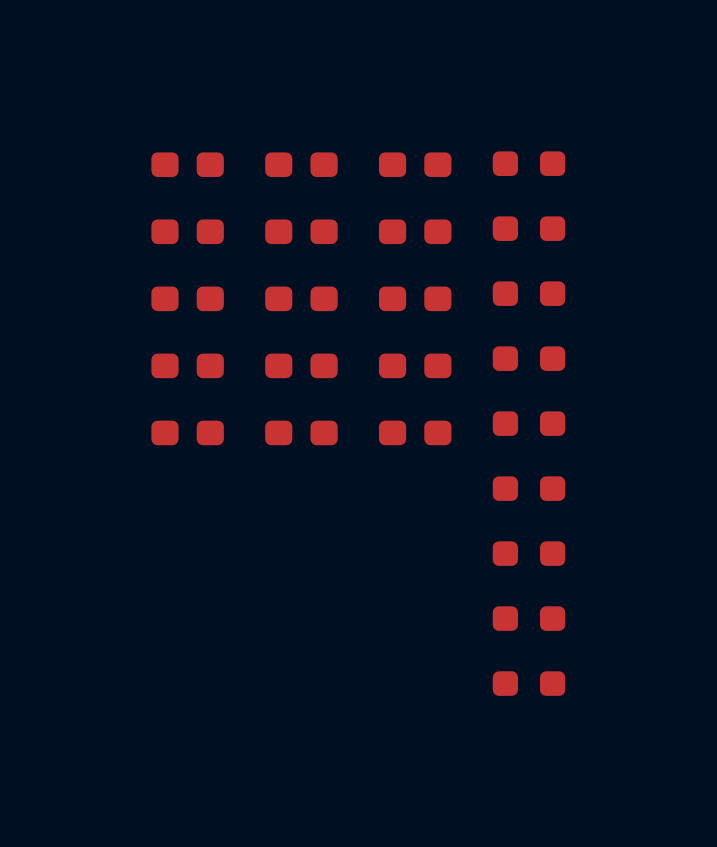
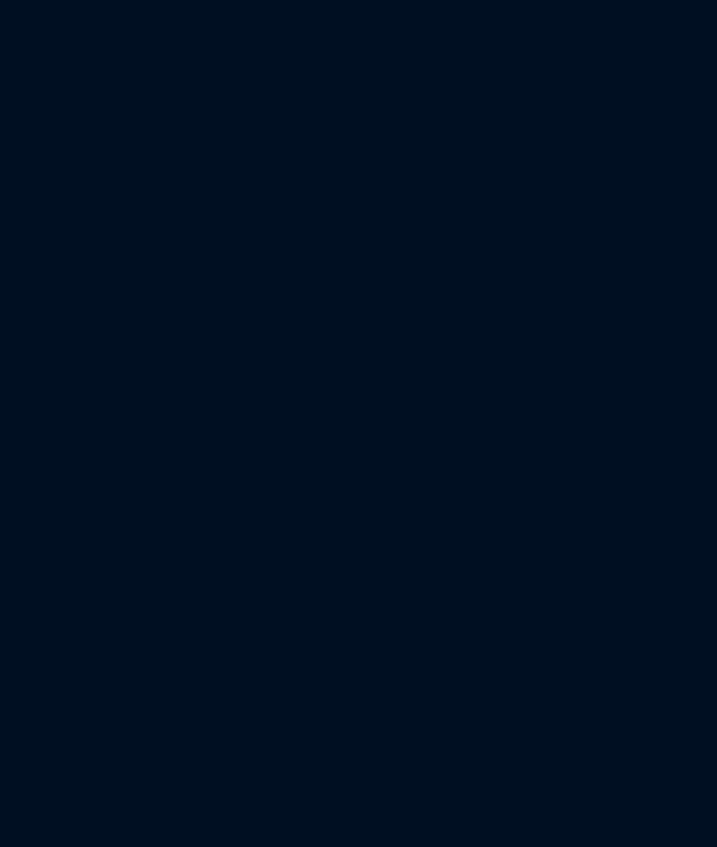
part: (529, 163) -> none
part: (187, 164) -> none
part: (301, 164) -> none
part: (415, 164) -> none
part: (529, 228) -> none
part: (187, 231) -> none
part: (301, 231) -> none
part: (415, 231) -> none
part: (529, 293) -> none
part: (187, 298) -> none
part: (301, 298) -> none
part: (415, 298) -> none
part: (529, 358) -> none
part: (187, 365) -> none
part: (301, 365) -> none
part: (415, 365) -> none
part: (529, 423) -> none
part: (187, 432) -> none
part: (301, 432) -> none
part: (415, 432) -> none
part: (529, 488) -> none
part: (529, 553) -> none
part: (529, 618) -> none
part: (529, 683) -> none

